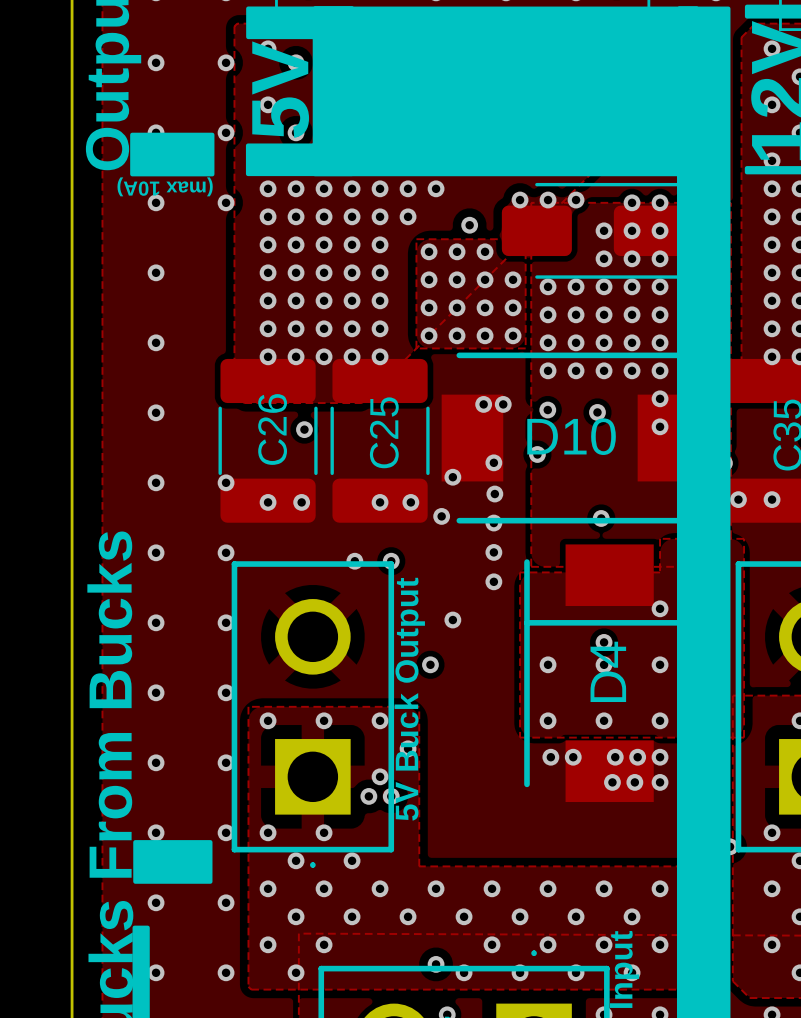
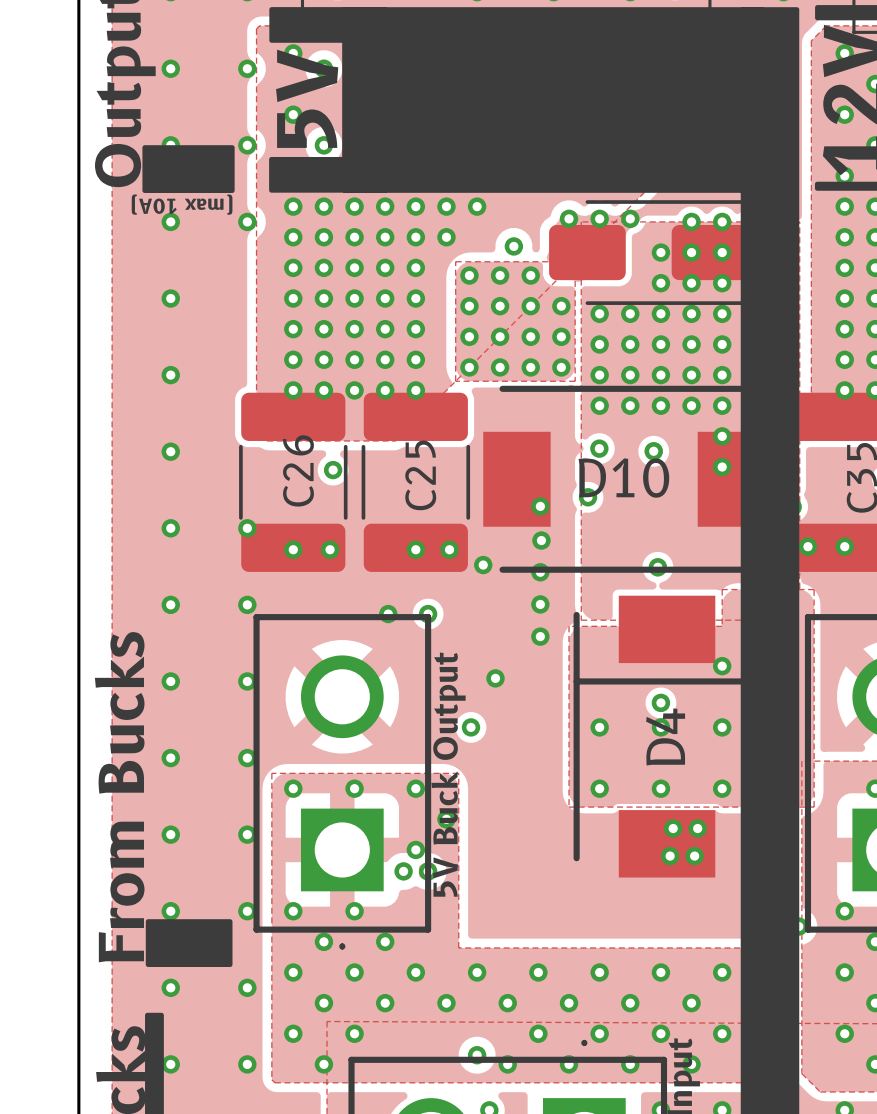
via: (483, 404) -> none
via: (503, 404) -> none
via: (452, 477) -> none
via: (550, 757) -> none
via: (573, 757) -> none
via: (660, 757) -> none
via: (660, 782) -> none

